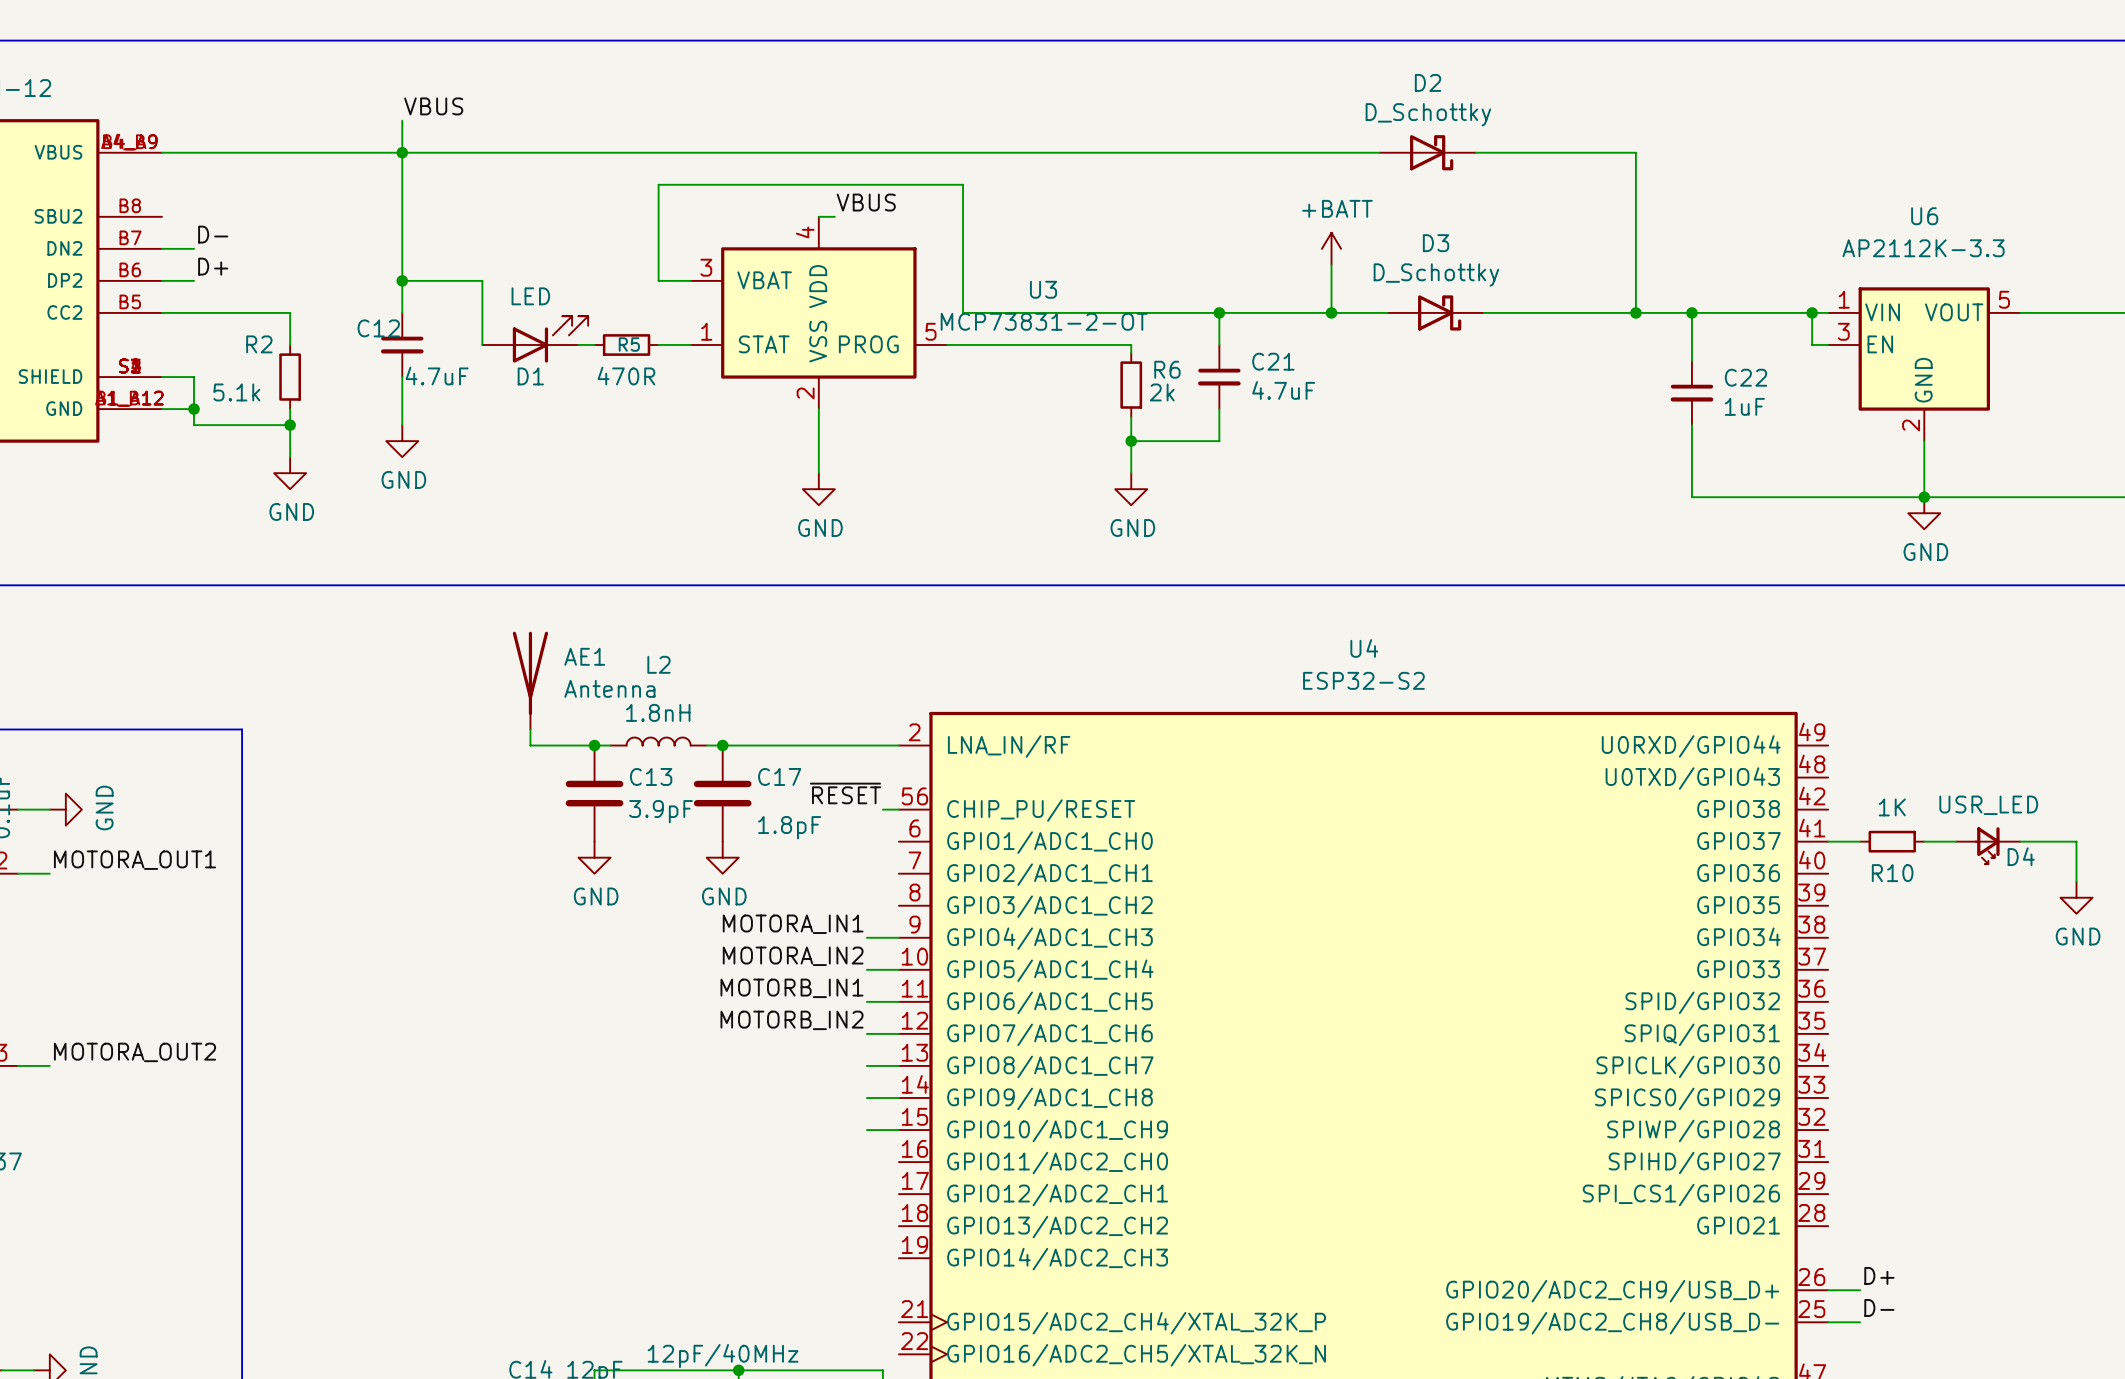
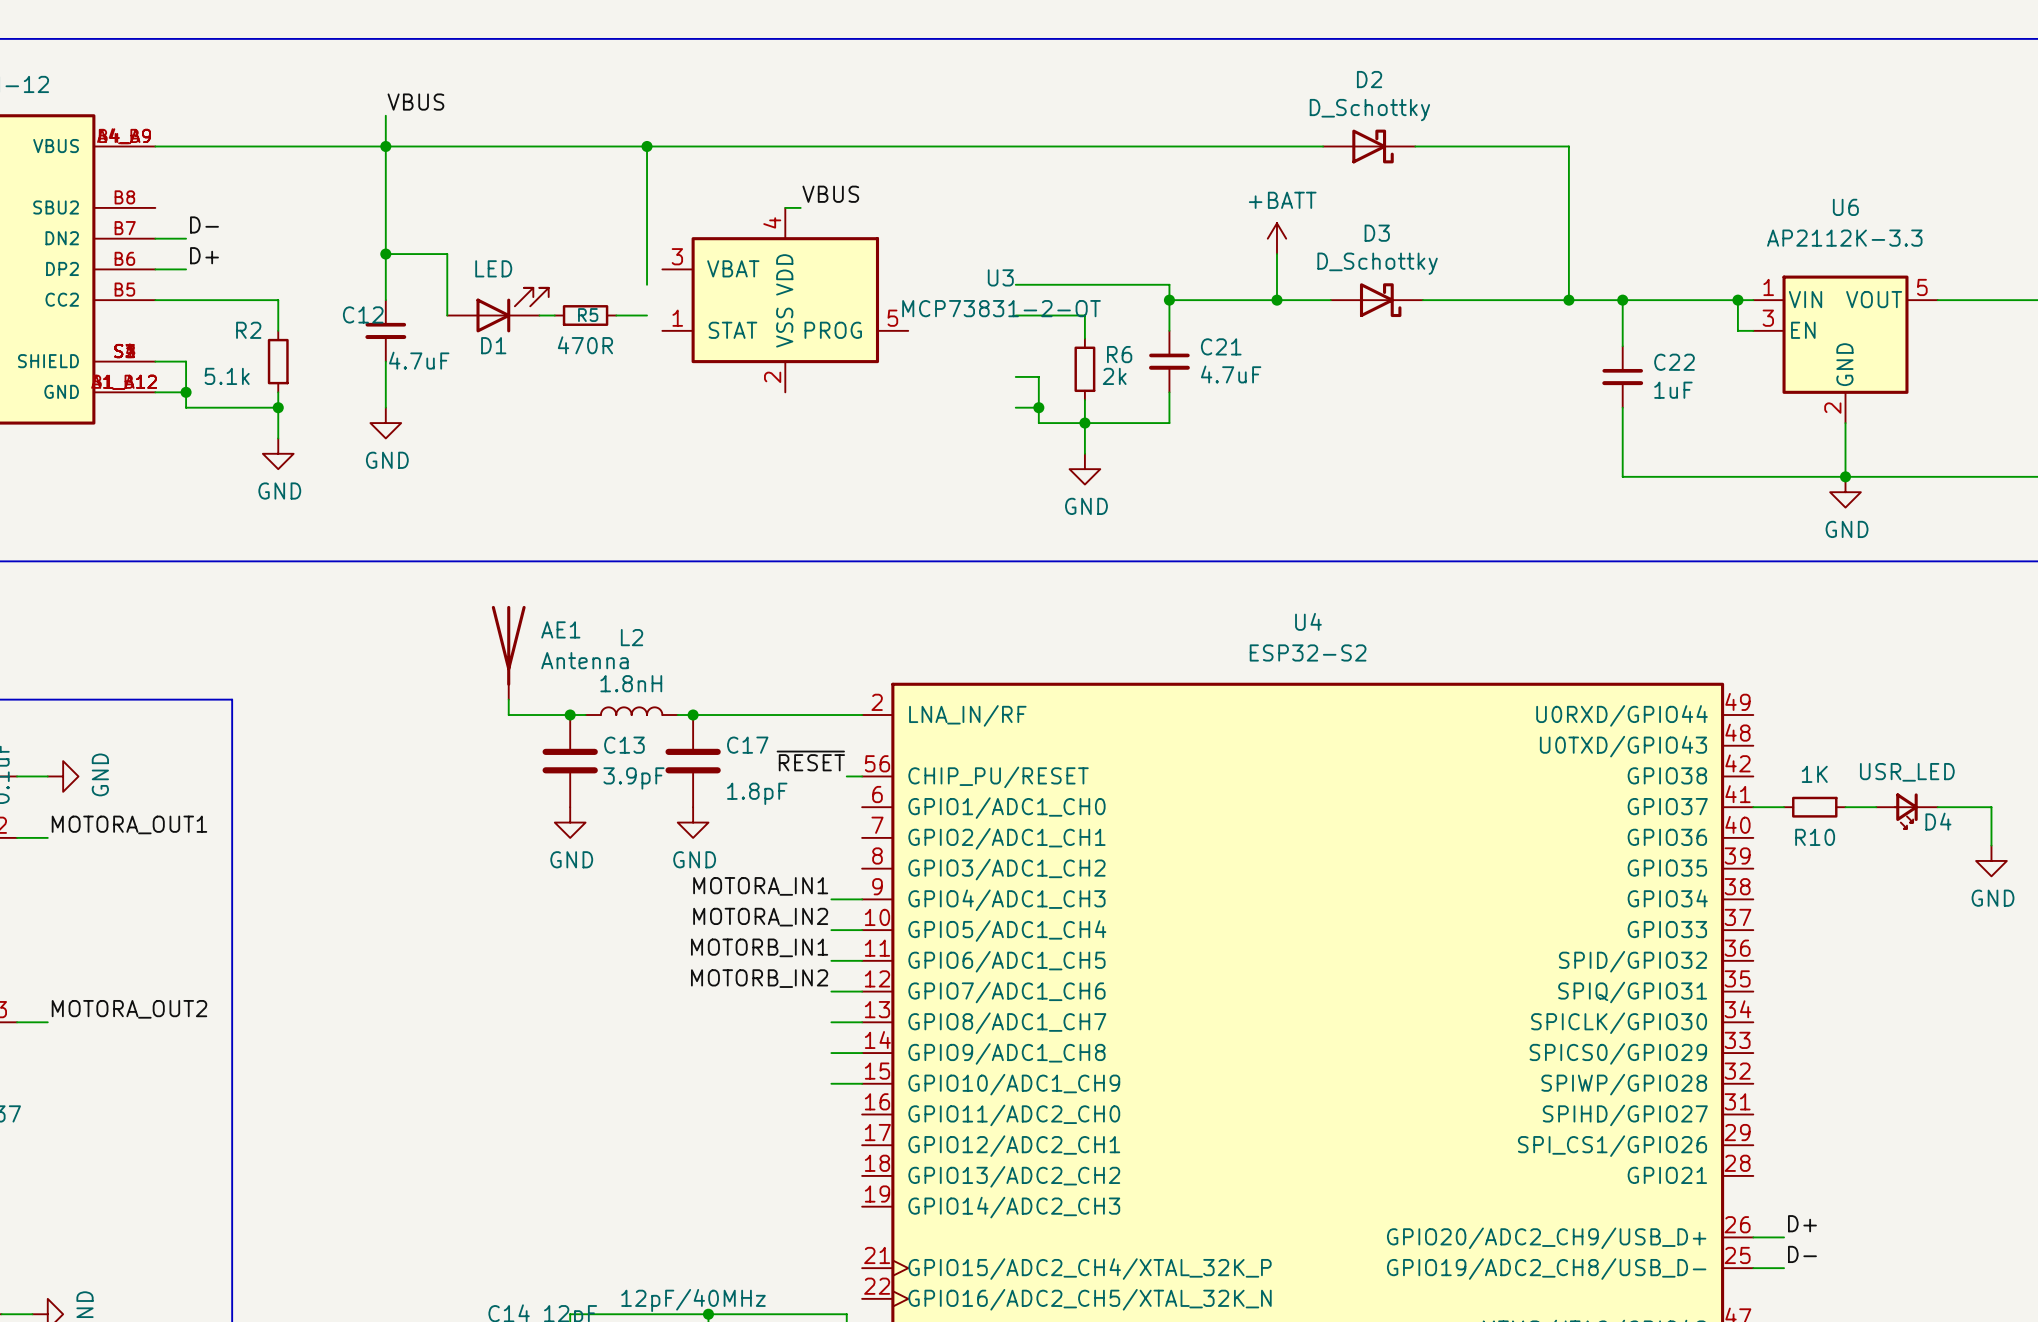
wire: none -> (647, 146) (647, 284)
junction: none -> (647, 146)
wire: none -> (385, 254) (447, 254) (447, 315)
wire: (402, 280) (482, 280) (482, 345) -> none
junction position: (402, 280) -> (385, 254)
wire: (690, 280) (658, 280) (658, 184) (963, 184) (963, 312) (1219, 312) -> (1015, 284) (1169, 284) (1169, 300)
D1 position: (535, 339) -> (497, 310)
wire: (578, 345) (594, 345) -> (539, 315) (554, 315)
R5 position: (626, 345) -> (585, 315)
wire: (658, 345) (690, 345) -> (616, 315) (647, 315)
wire: (947, 345) (1131, 345) -> (1015, 315) (1084, 315) (1084, 330)
wire: none -> (1015, 376) (1038, 376) (1038, 423) (1084, 423)
wire: (818, 409) (818, 473) -> none
wire: none -> (1015, 407) (1038, 407)
junction: none -> (1038, 407)
power symbol: GND (818, 489) -> none

